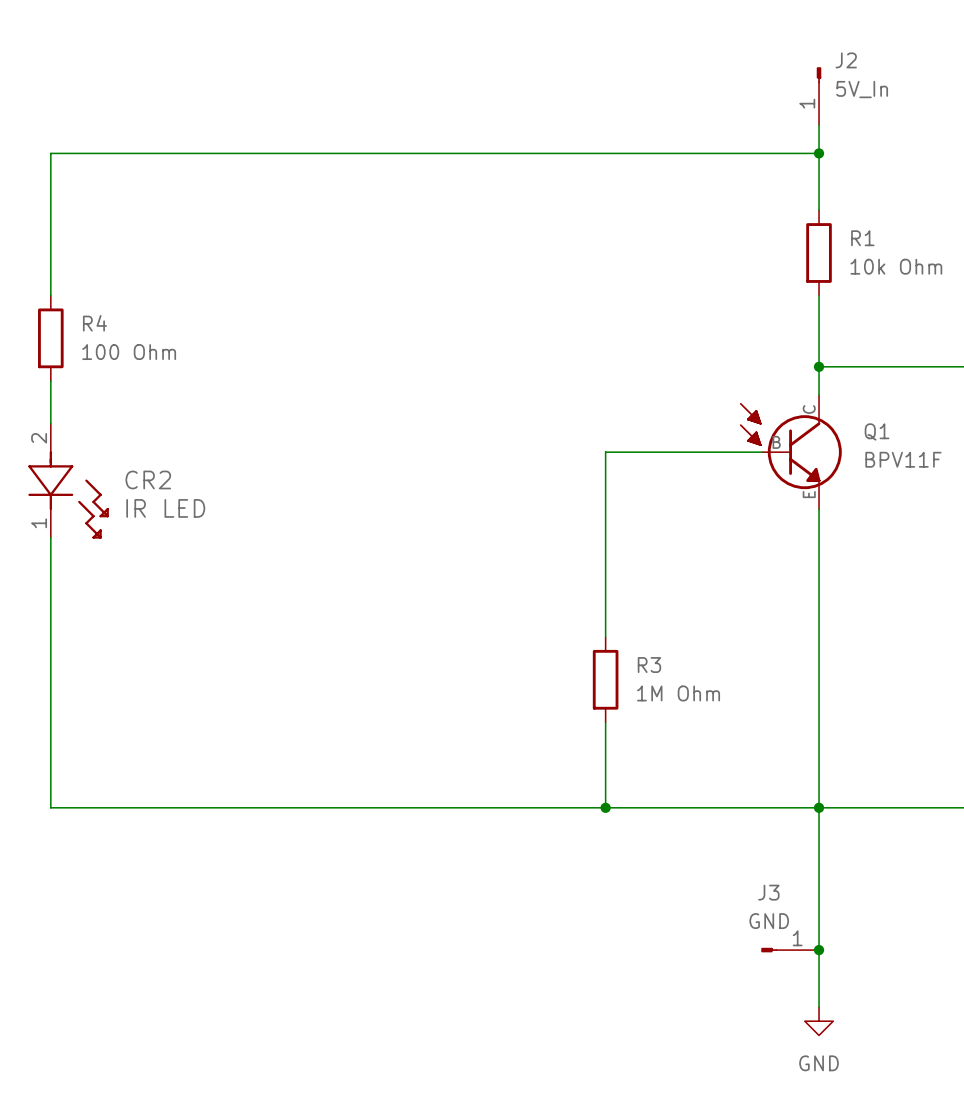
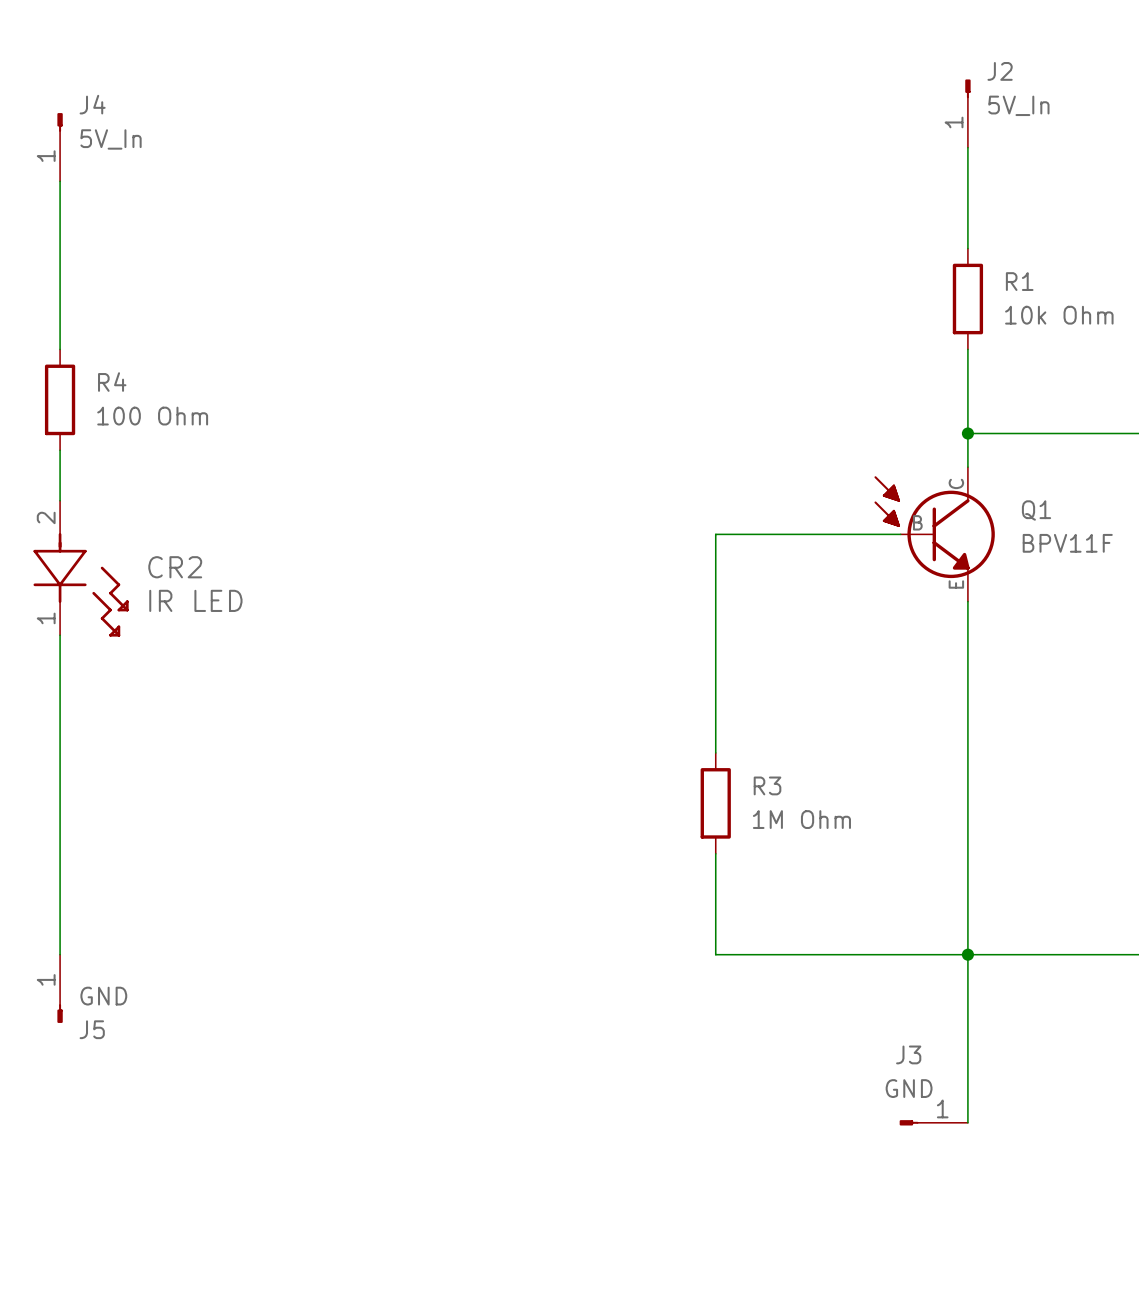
J4: none -> 5V_In (60, 147)
wire: (50, 153) (819, 153) -> none
junction: (819, 153) -> none
wire: (50, 807) (605, 807) -> none
junction: (605, 807) -> none
J5: none -> GND (60, 988)
wire: (819, 950) (819, 1006) -> none
junction: (819, 950) -> none
power symbol: GND (819, 1021) -> none

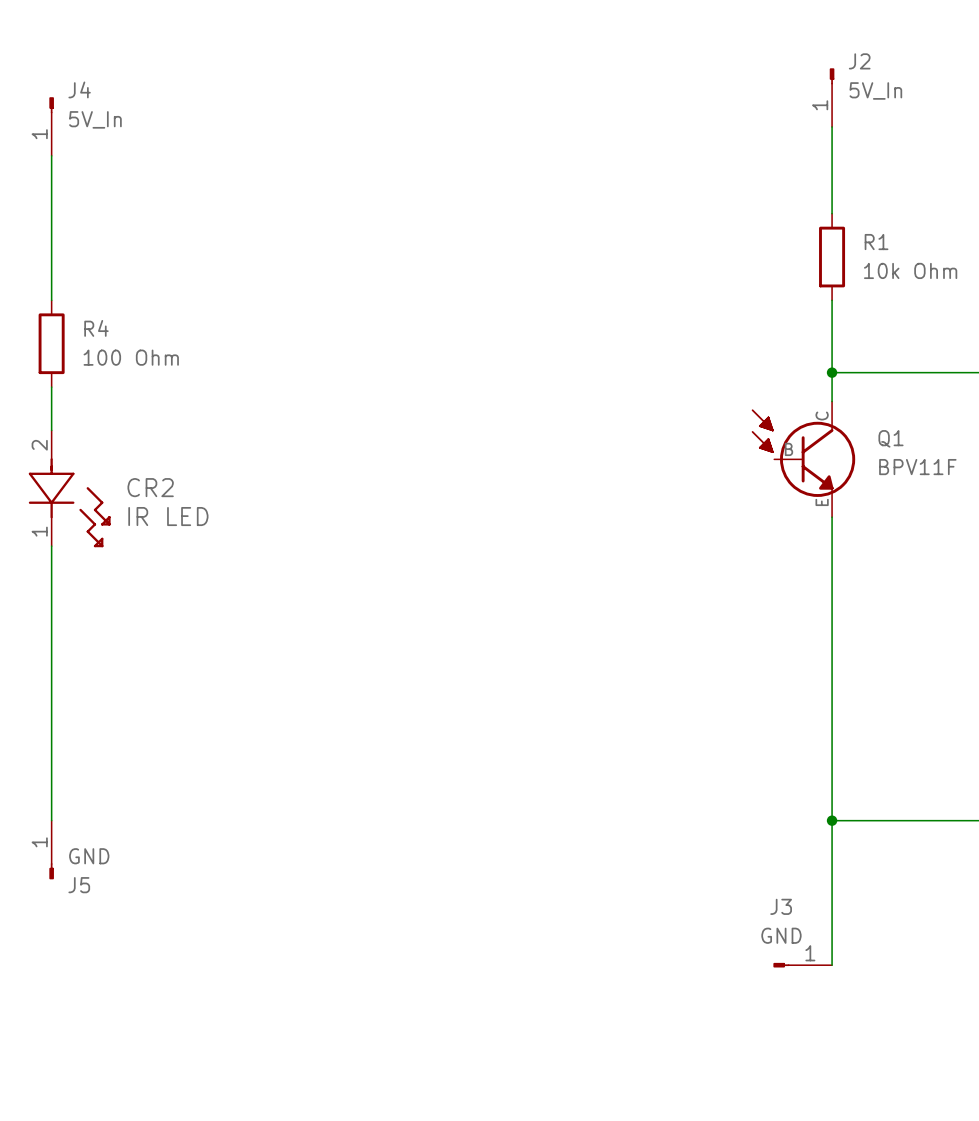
wire: (900, 534) (715, 534) (715, 752) -> none
R3: 1M Ohm (715, 803) -> none
wire: (715, 853) (715, 954) (967, 954) -> none

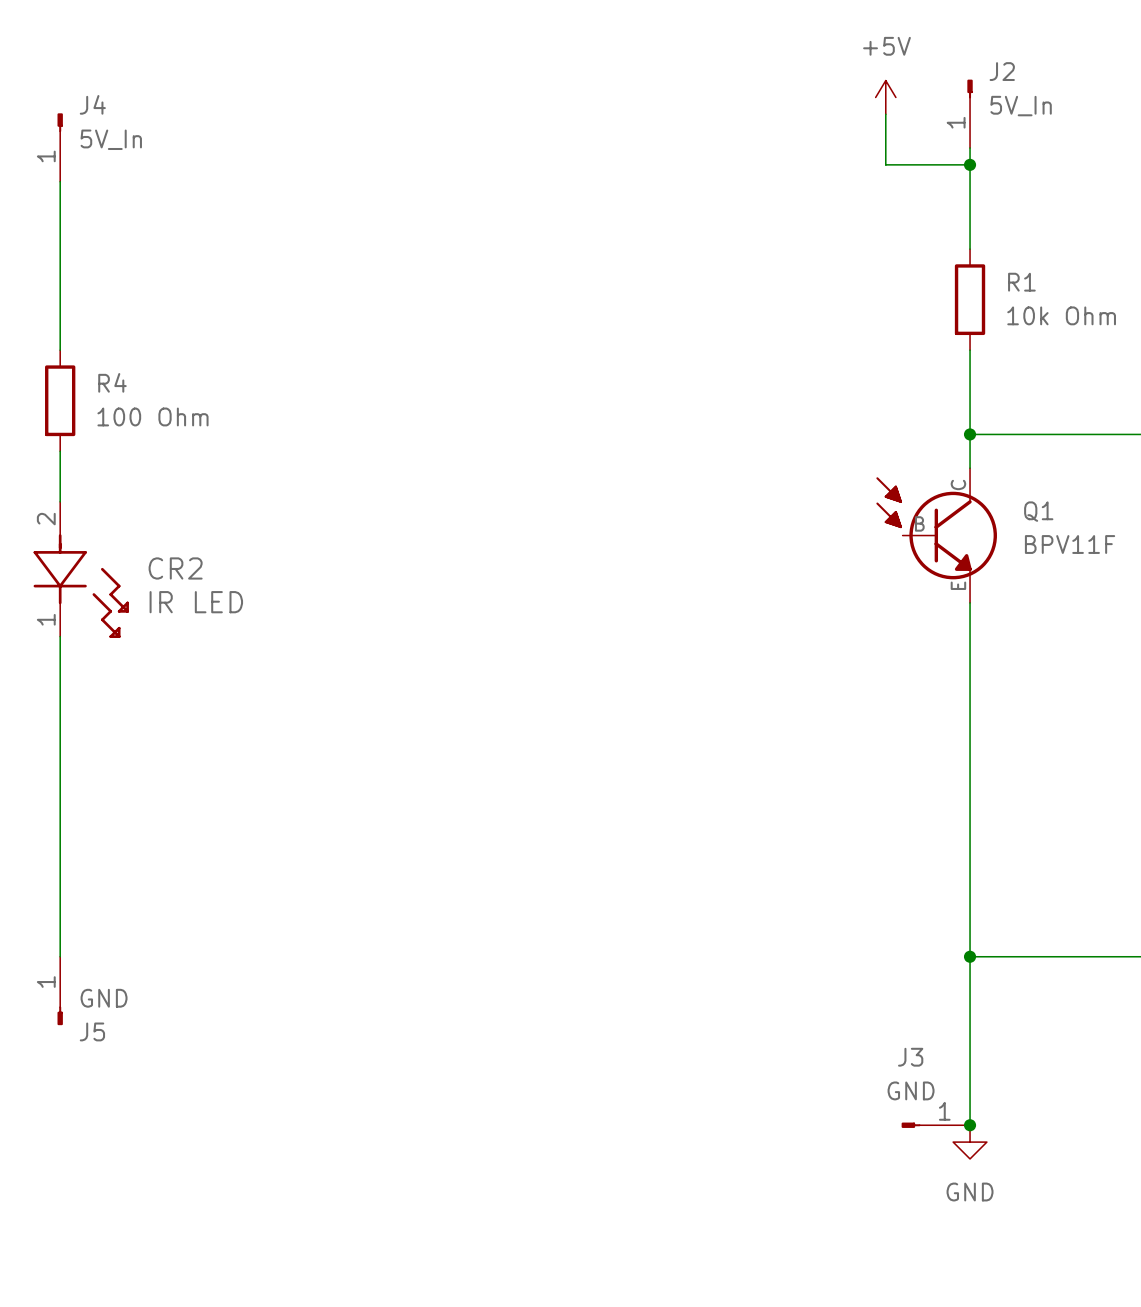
power symbol: none -> +5V (885, 97)
wire: none -> (885, 114) (885, 164) (970, 164)
junction: none -> (970, 164)
junction: none -> (970, 1125)
power symbol: none -> GND (970, 1142)

